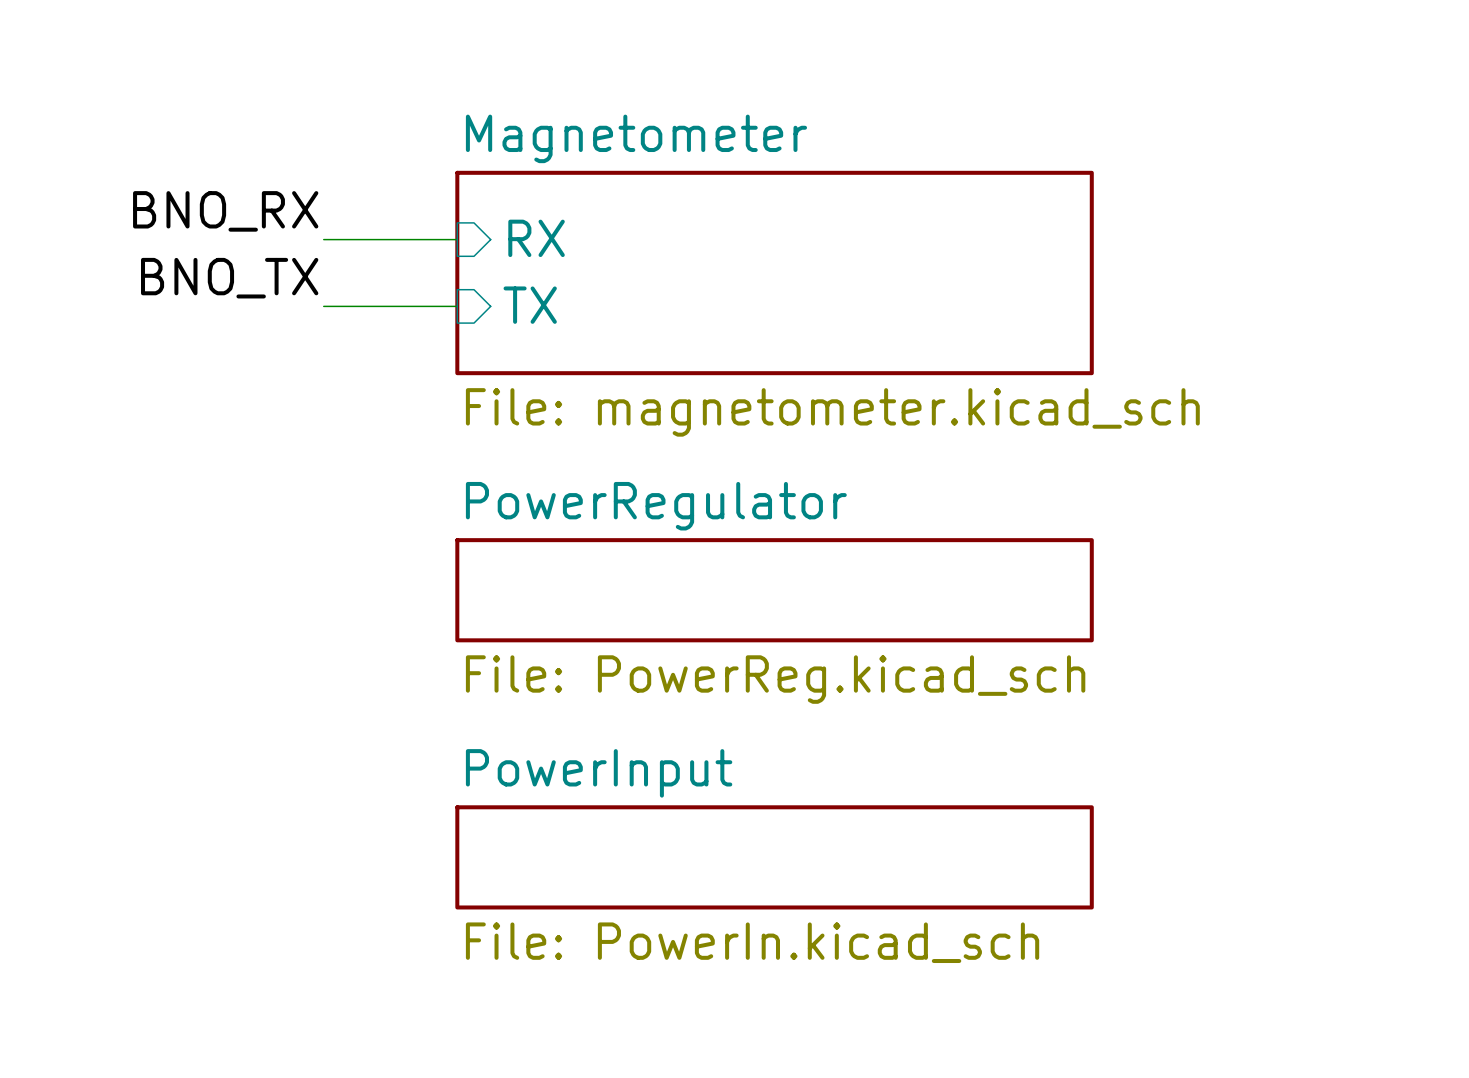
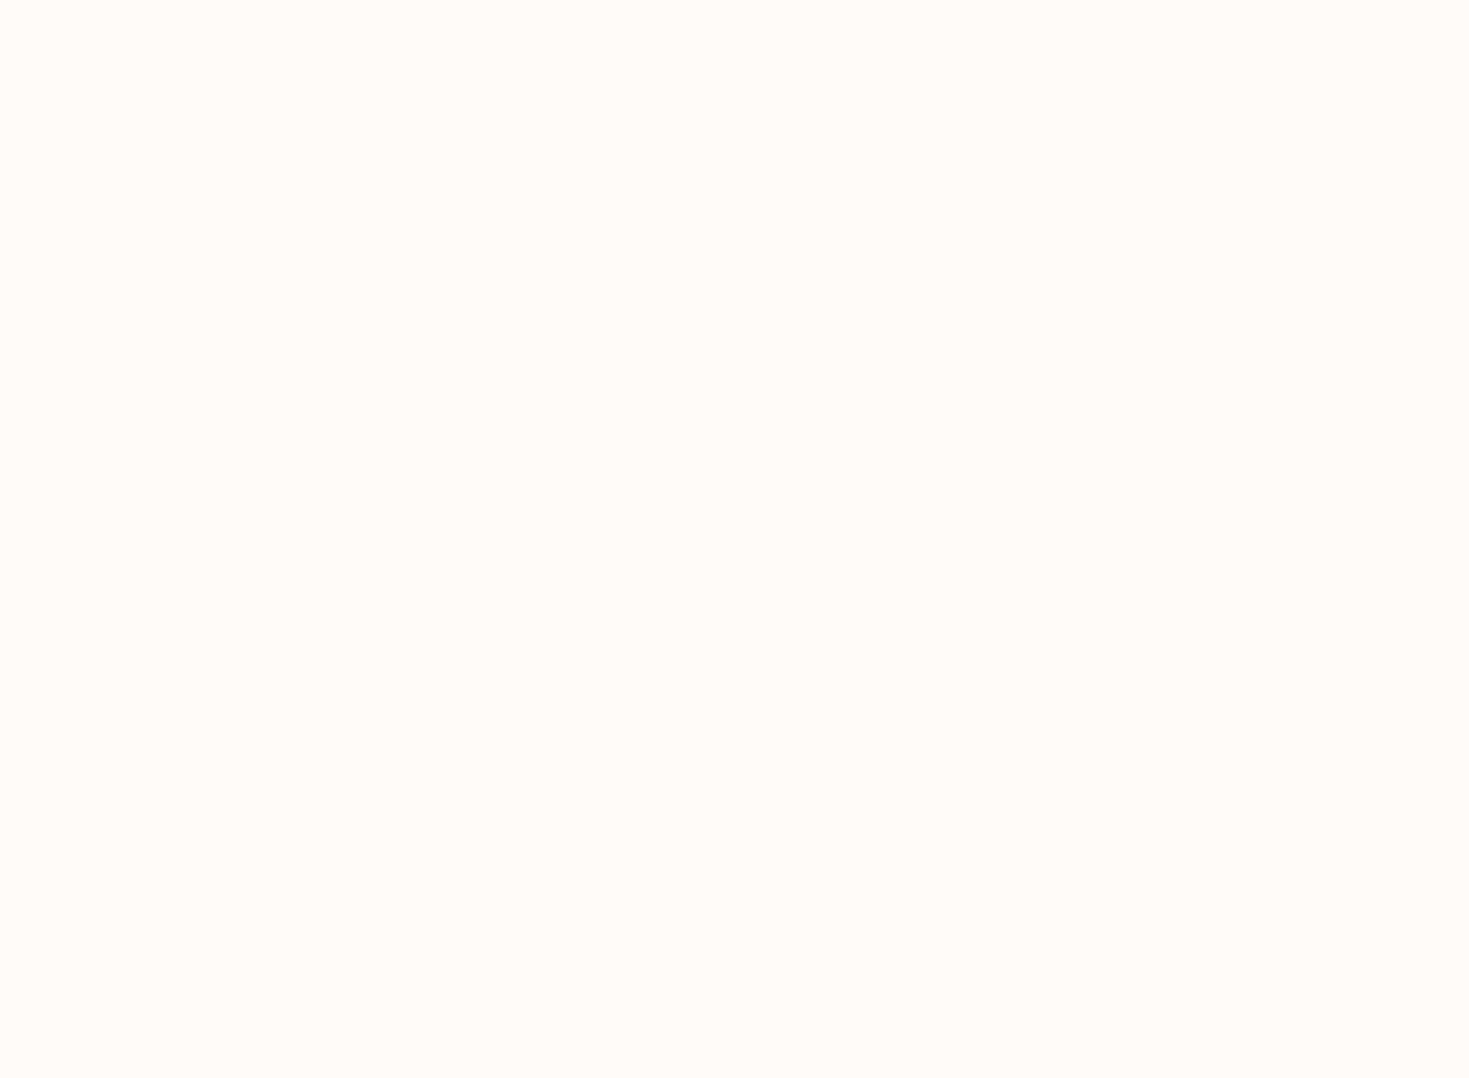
label: BNO_RX (225, 211) -> none
sheet pin: RX (536, 238) -> none
wire: (323, 239) (457, 239) -> none
sheet Magnetometer: File: magnetometer.kicad_sch (774, 272) -> none
label: BNO_TX (229, 278) -> none
sheet pin: TX (530, 305) -> none
wire: (323, 306) (457, 306) -> none
sheet PowerRegulator: File: PowerReg.kicad_sch (774, 590) -> none
sheet PowerInput: File: PowerIn.kicad_sch (774, 857) -> none

